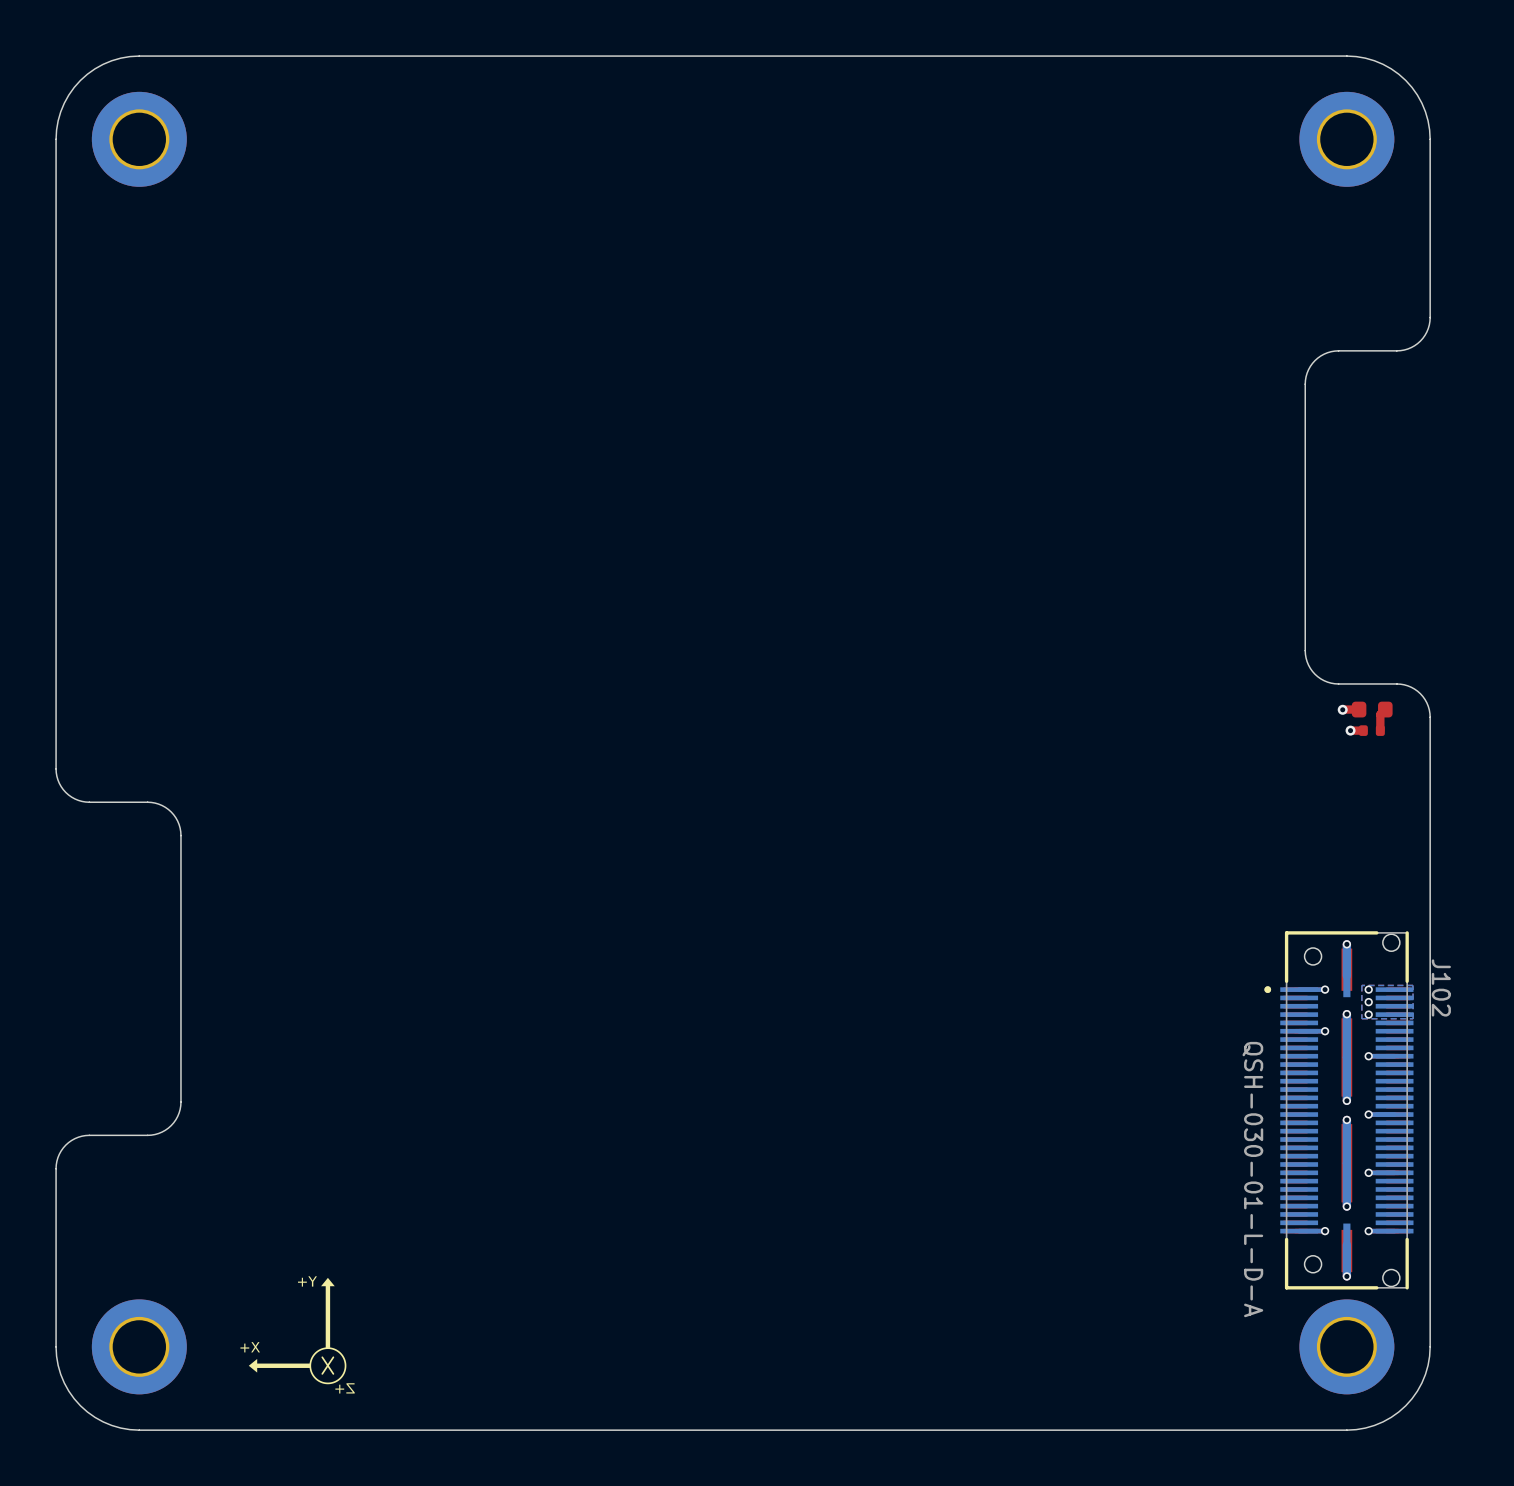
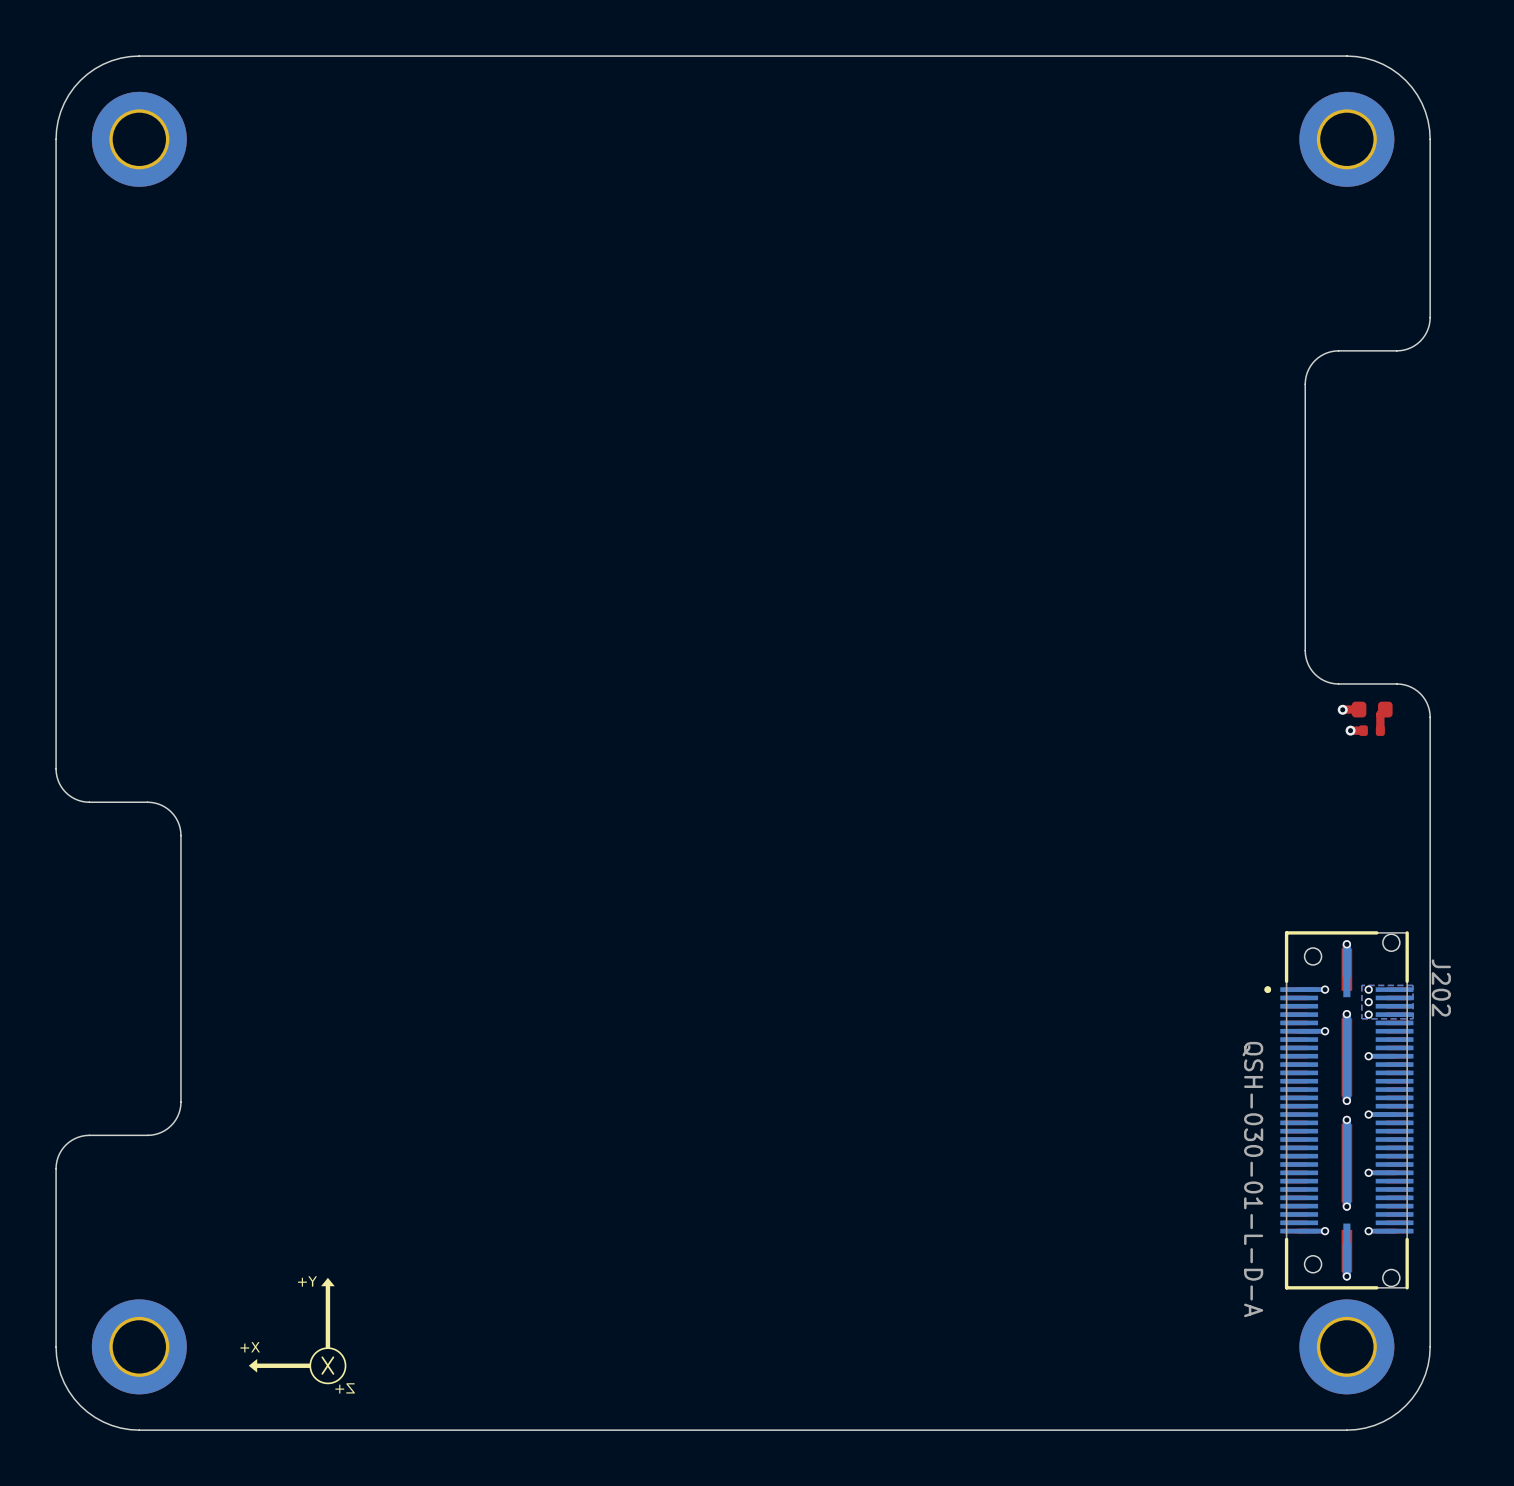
J102 name: J102 (1441, 987) -> J202 (1441, 987)

